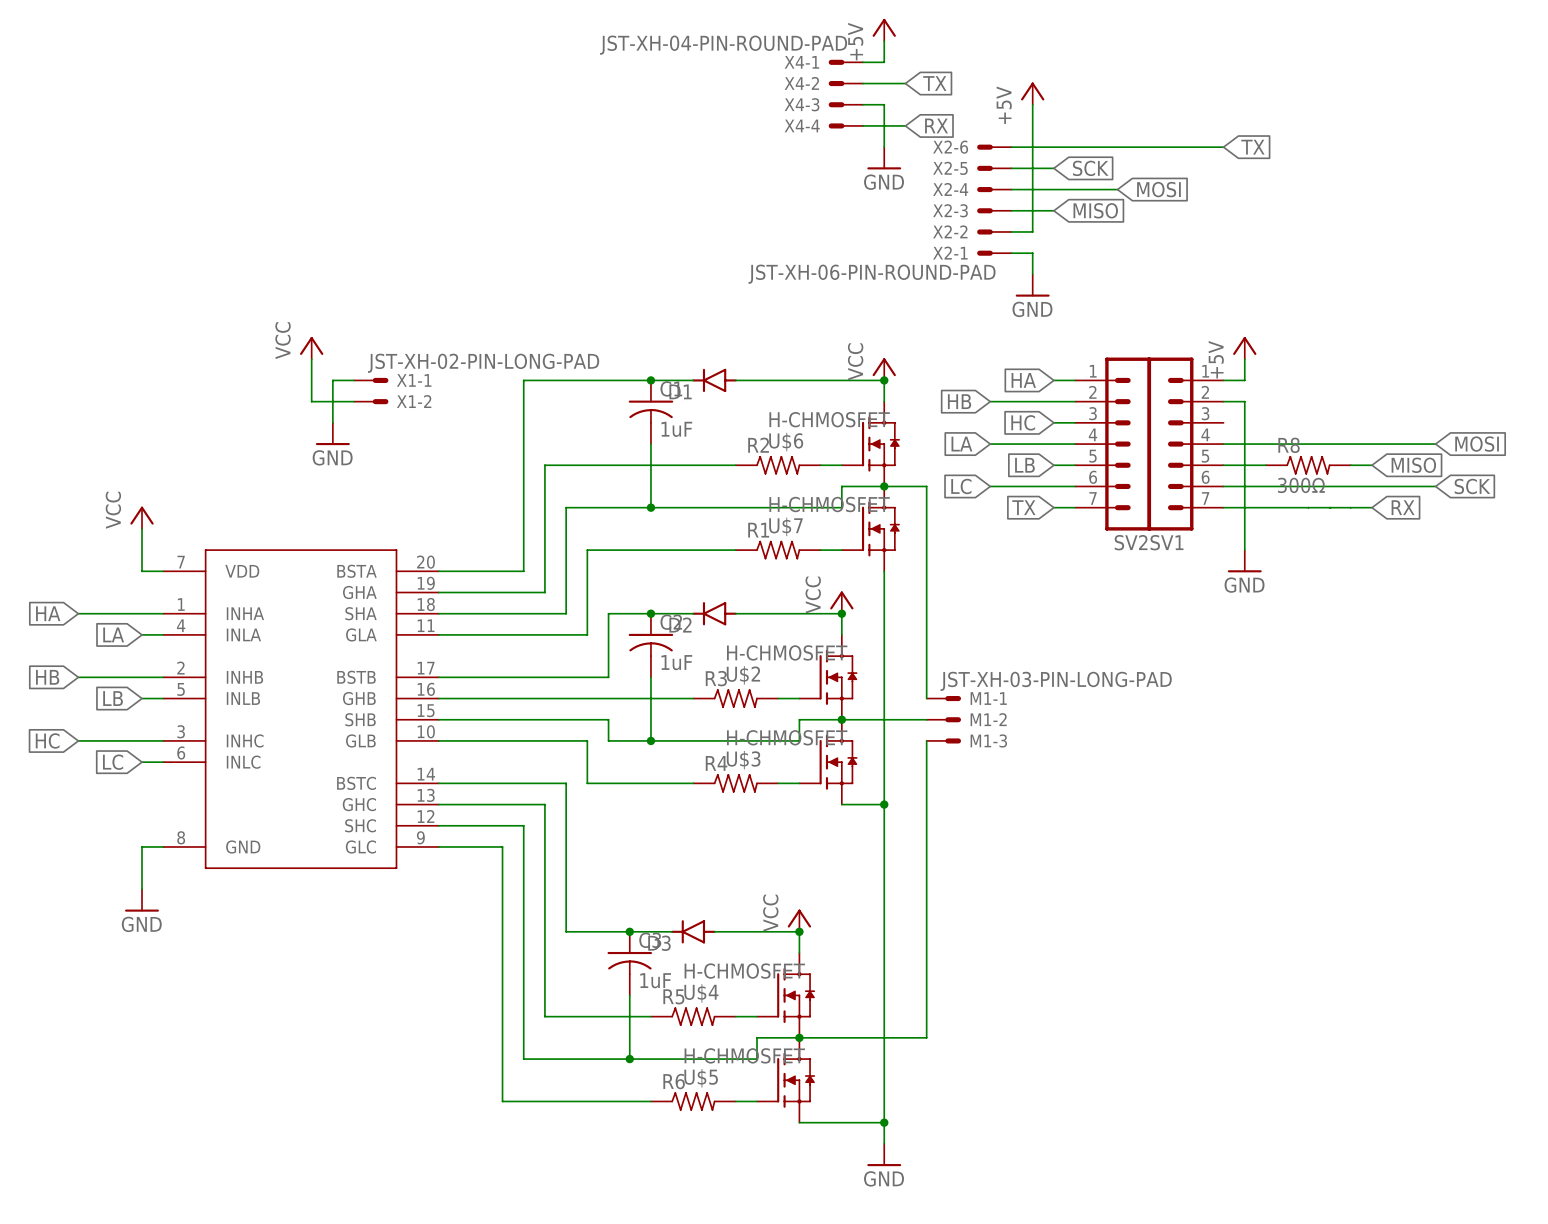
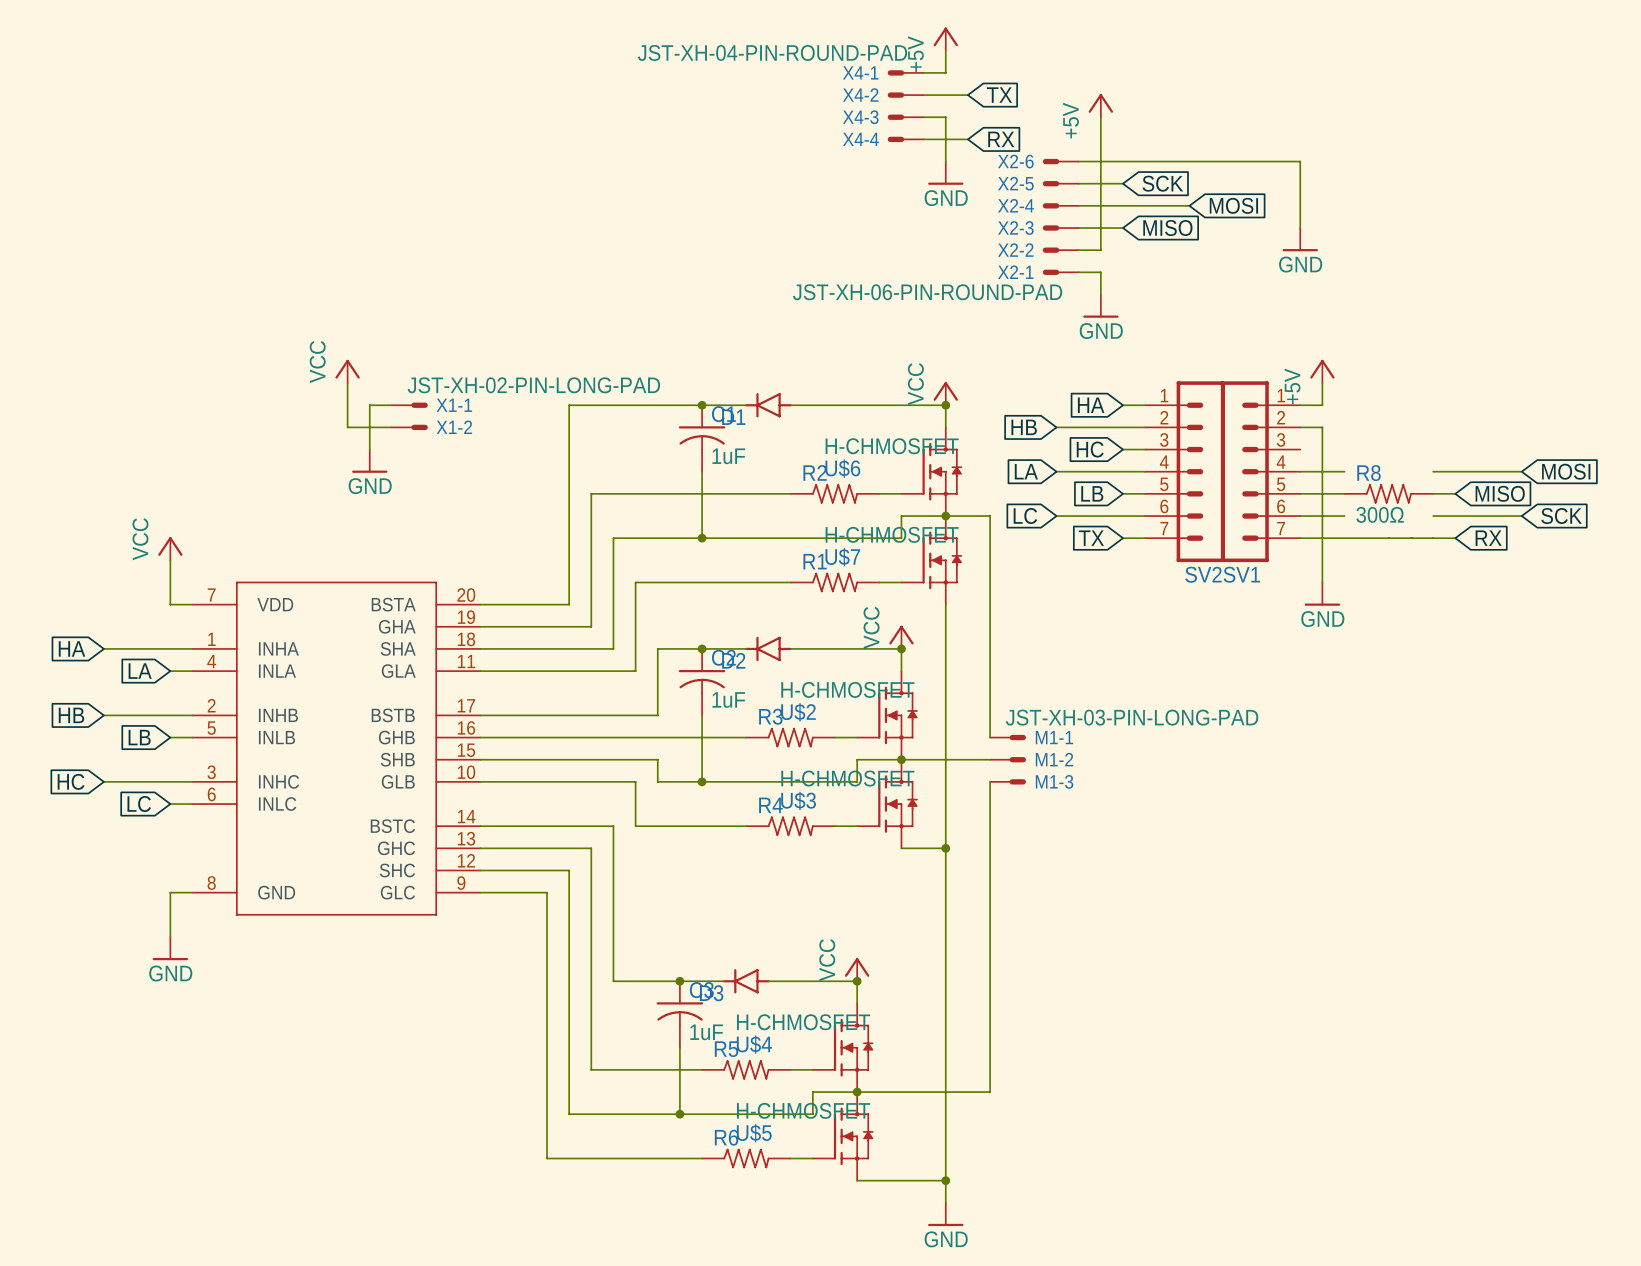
wire: none -> (1300, 161) (1300, 228)
global label: TX (1252, 147) -> none
power symbol: none -> GND (1300, 239)
wire: (1265, 444) (1350, 444) -> none
wire: (1265, 486) (1350, 486) -> none

